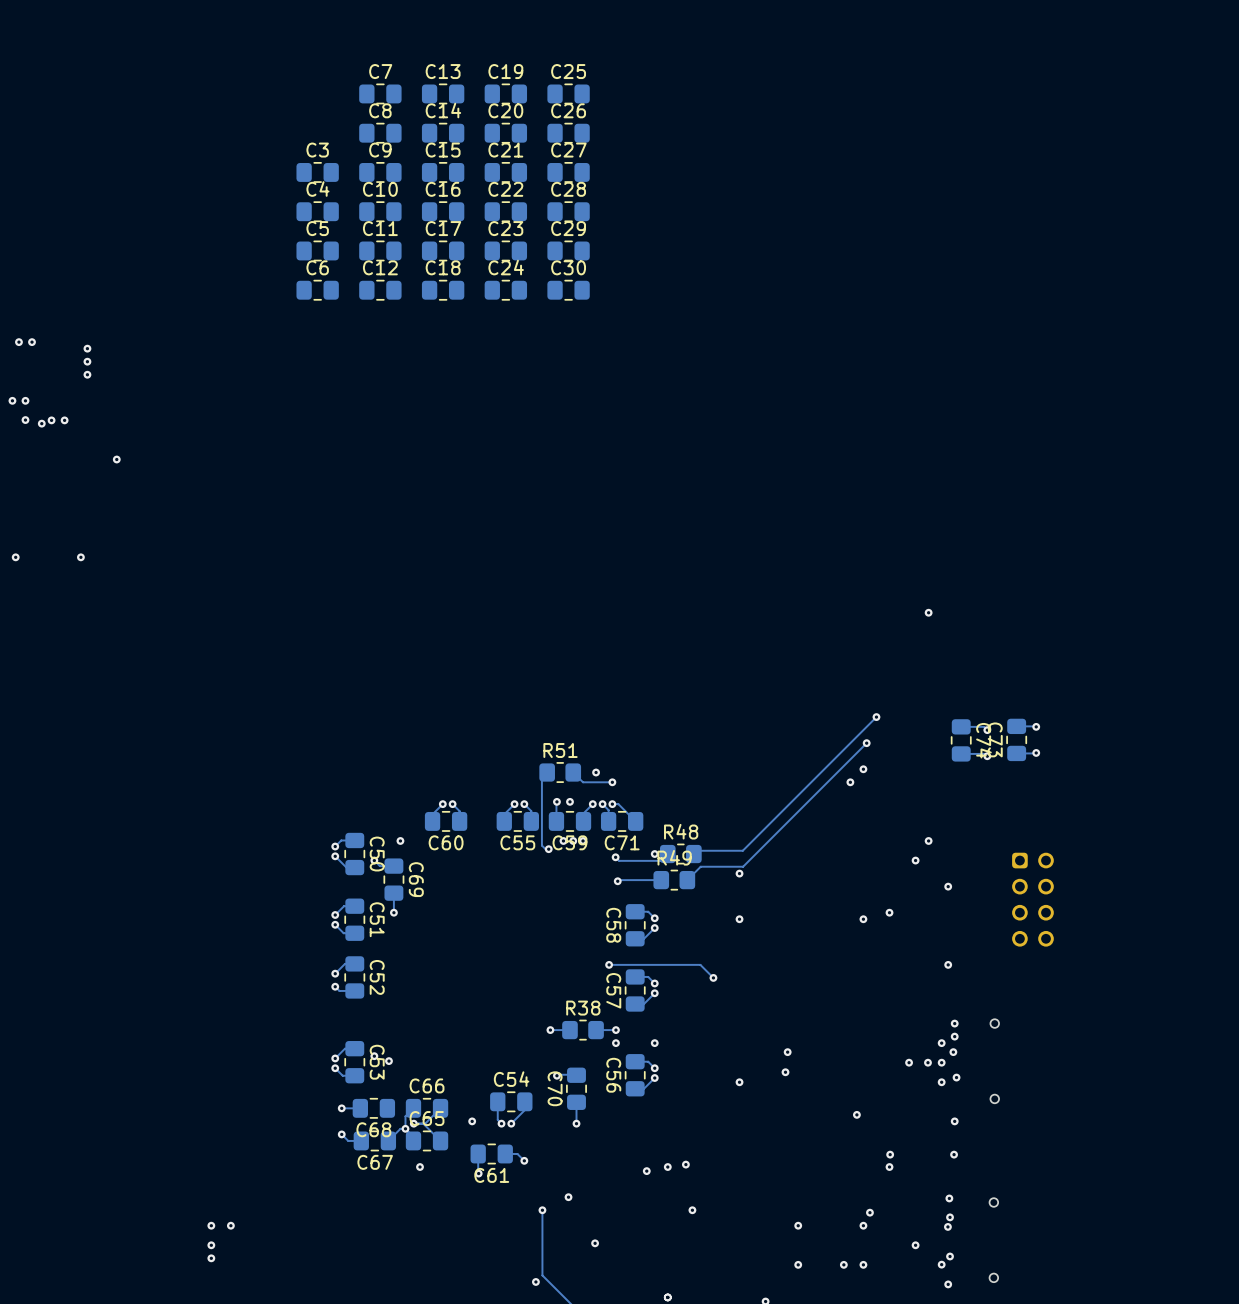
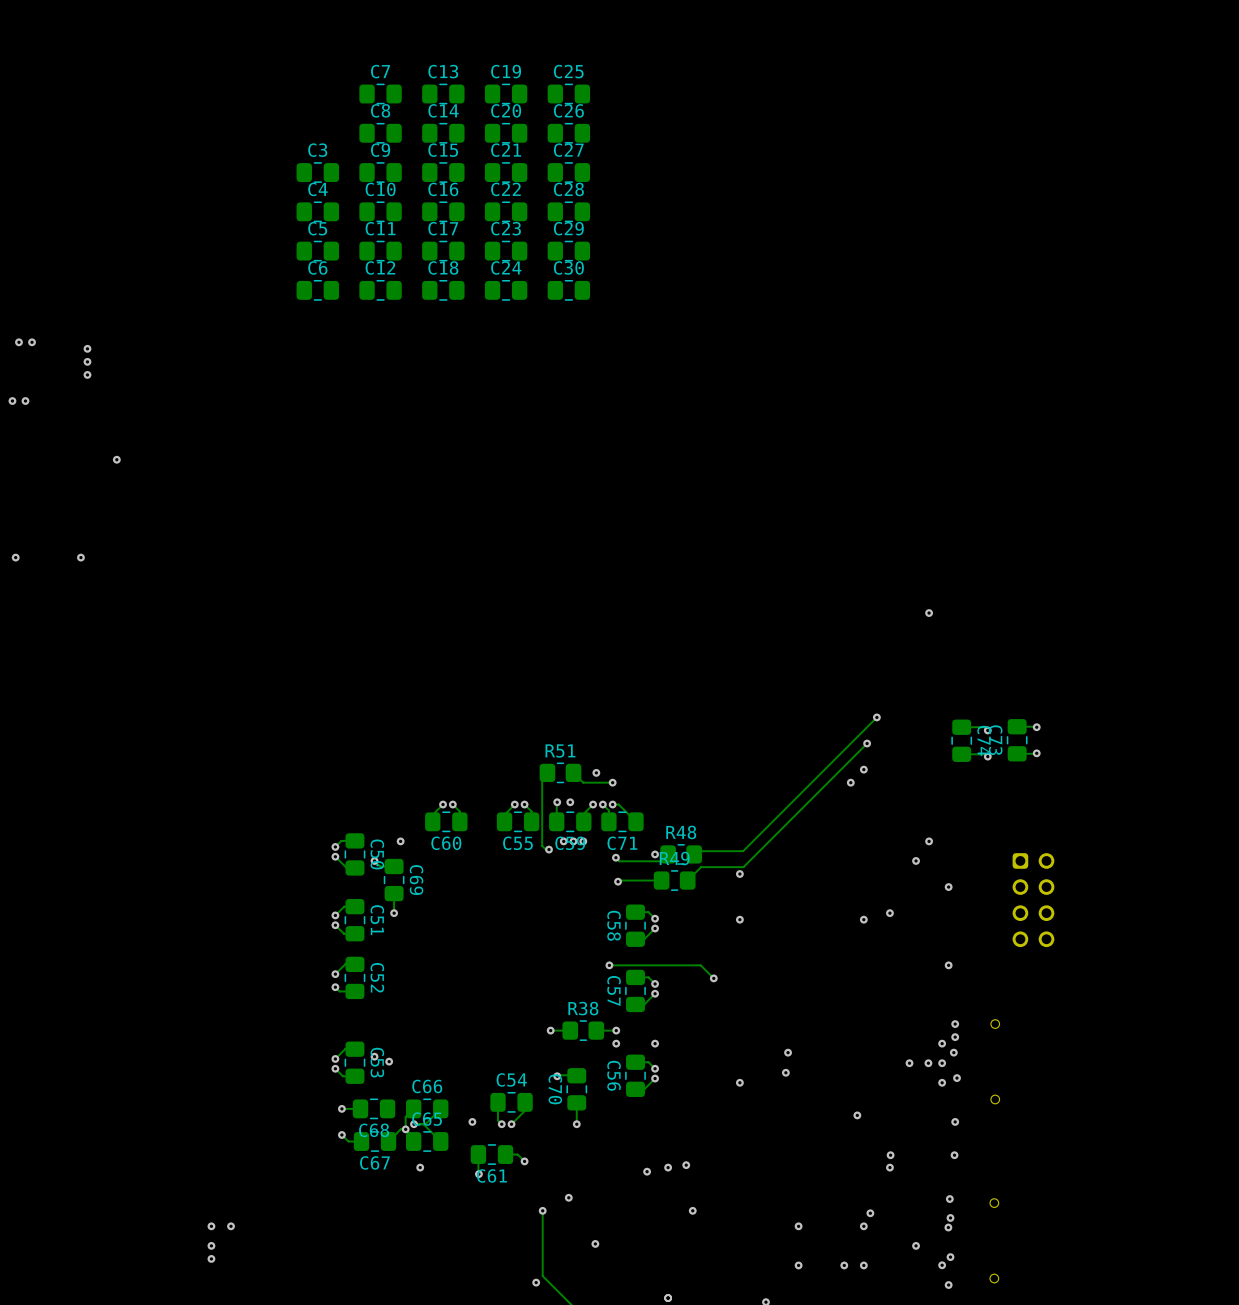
via: (25, 420) -> none
via: (51, 420) -> none
via: (64, 420) -> none
via: (41, 423) -> none

